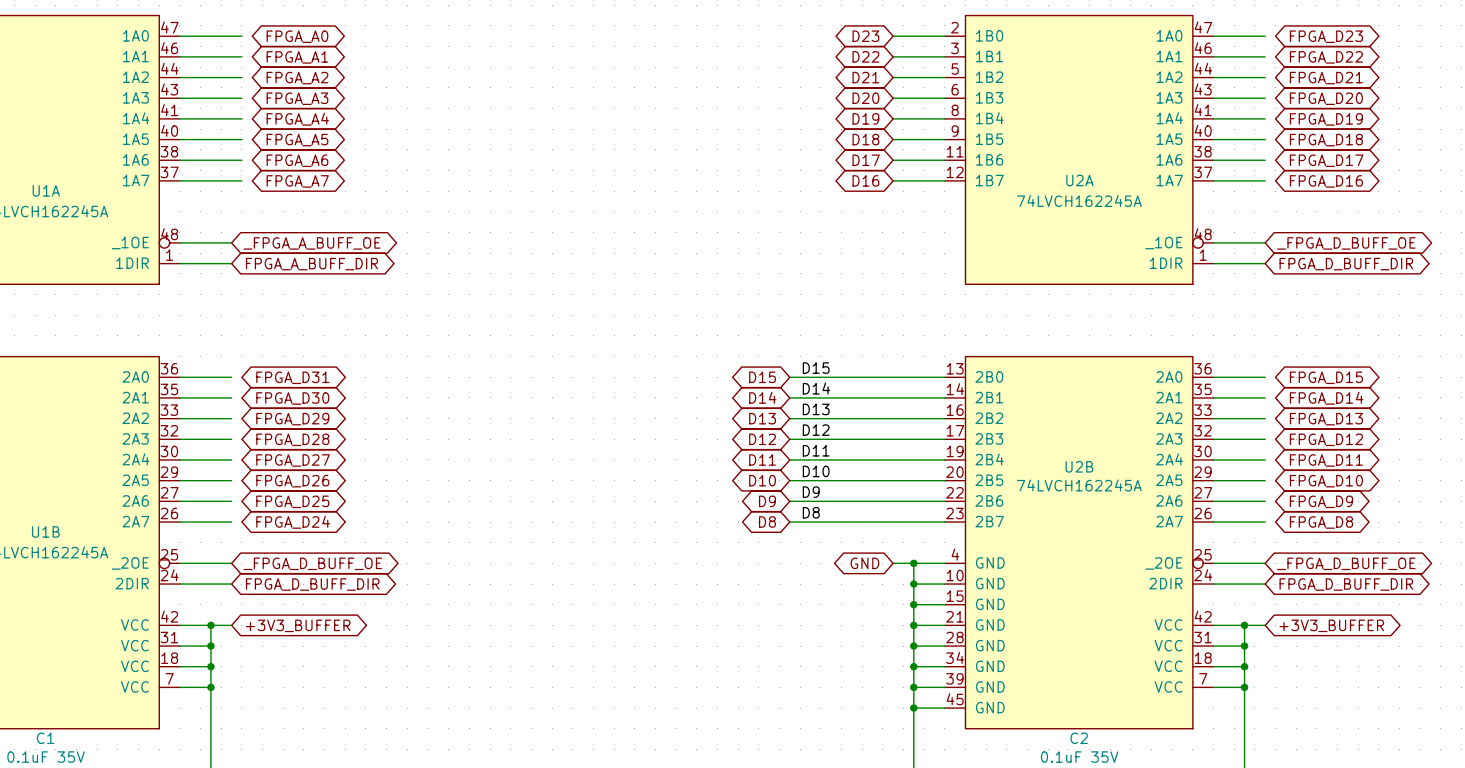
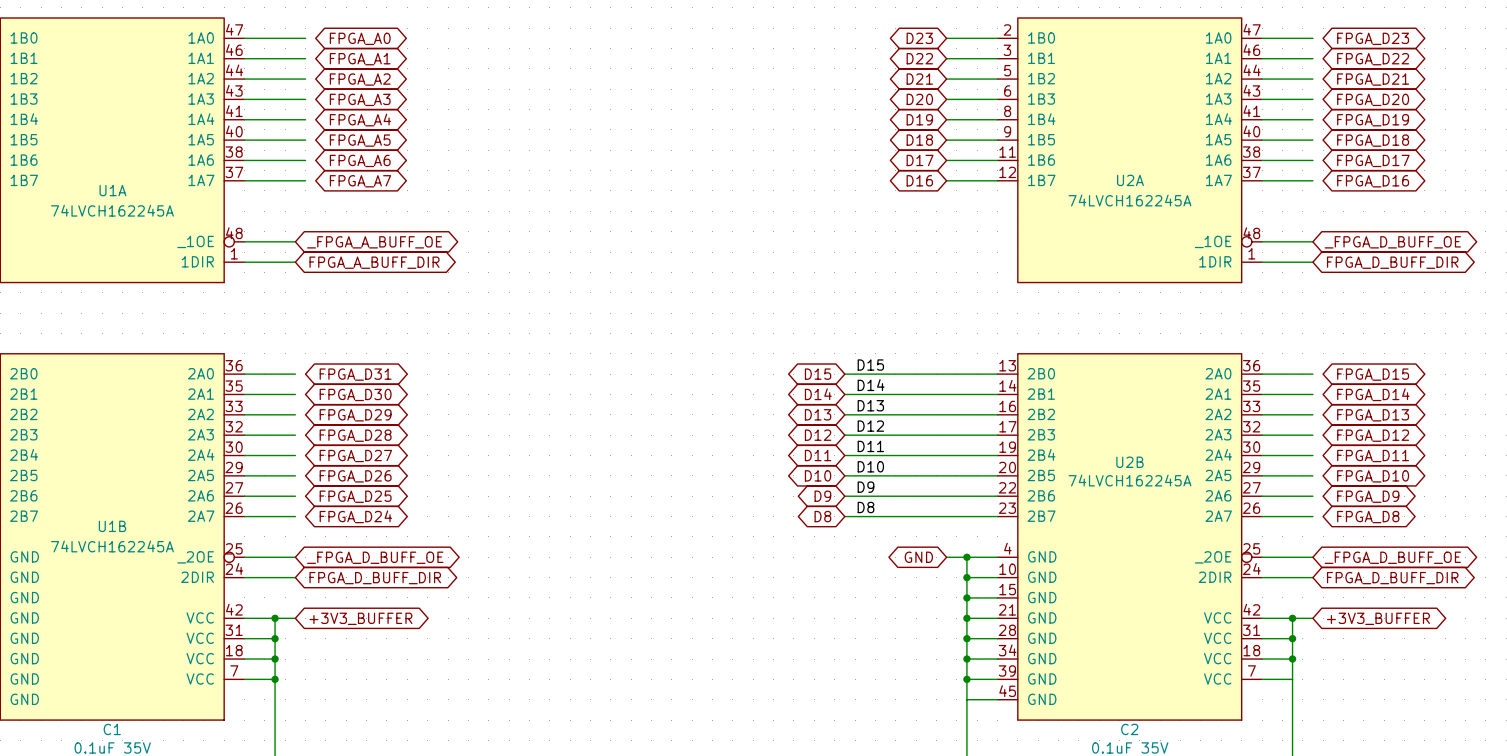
junction: (1244, 687) -> none
junction: (913, 708) -> none

